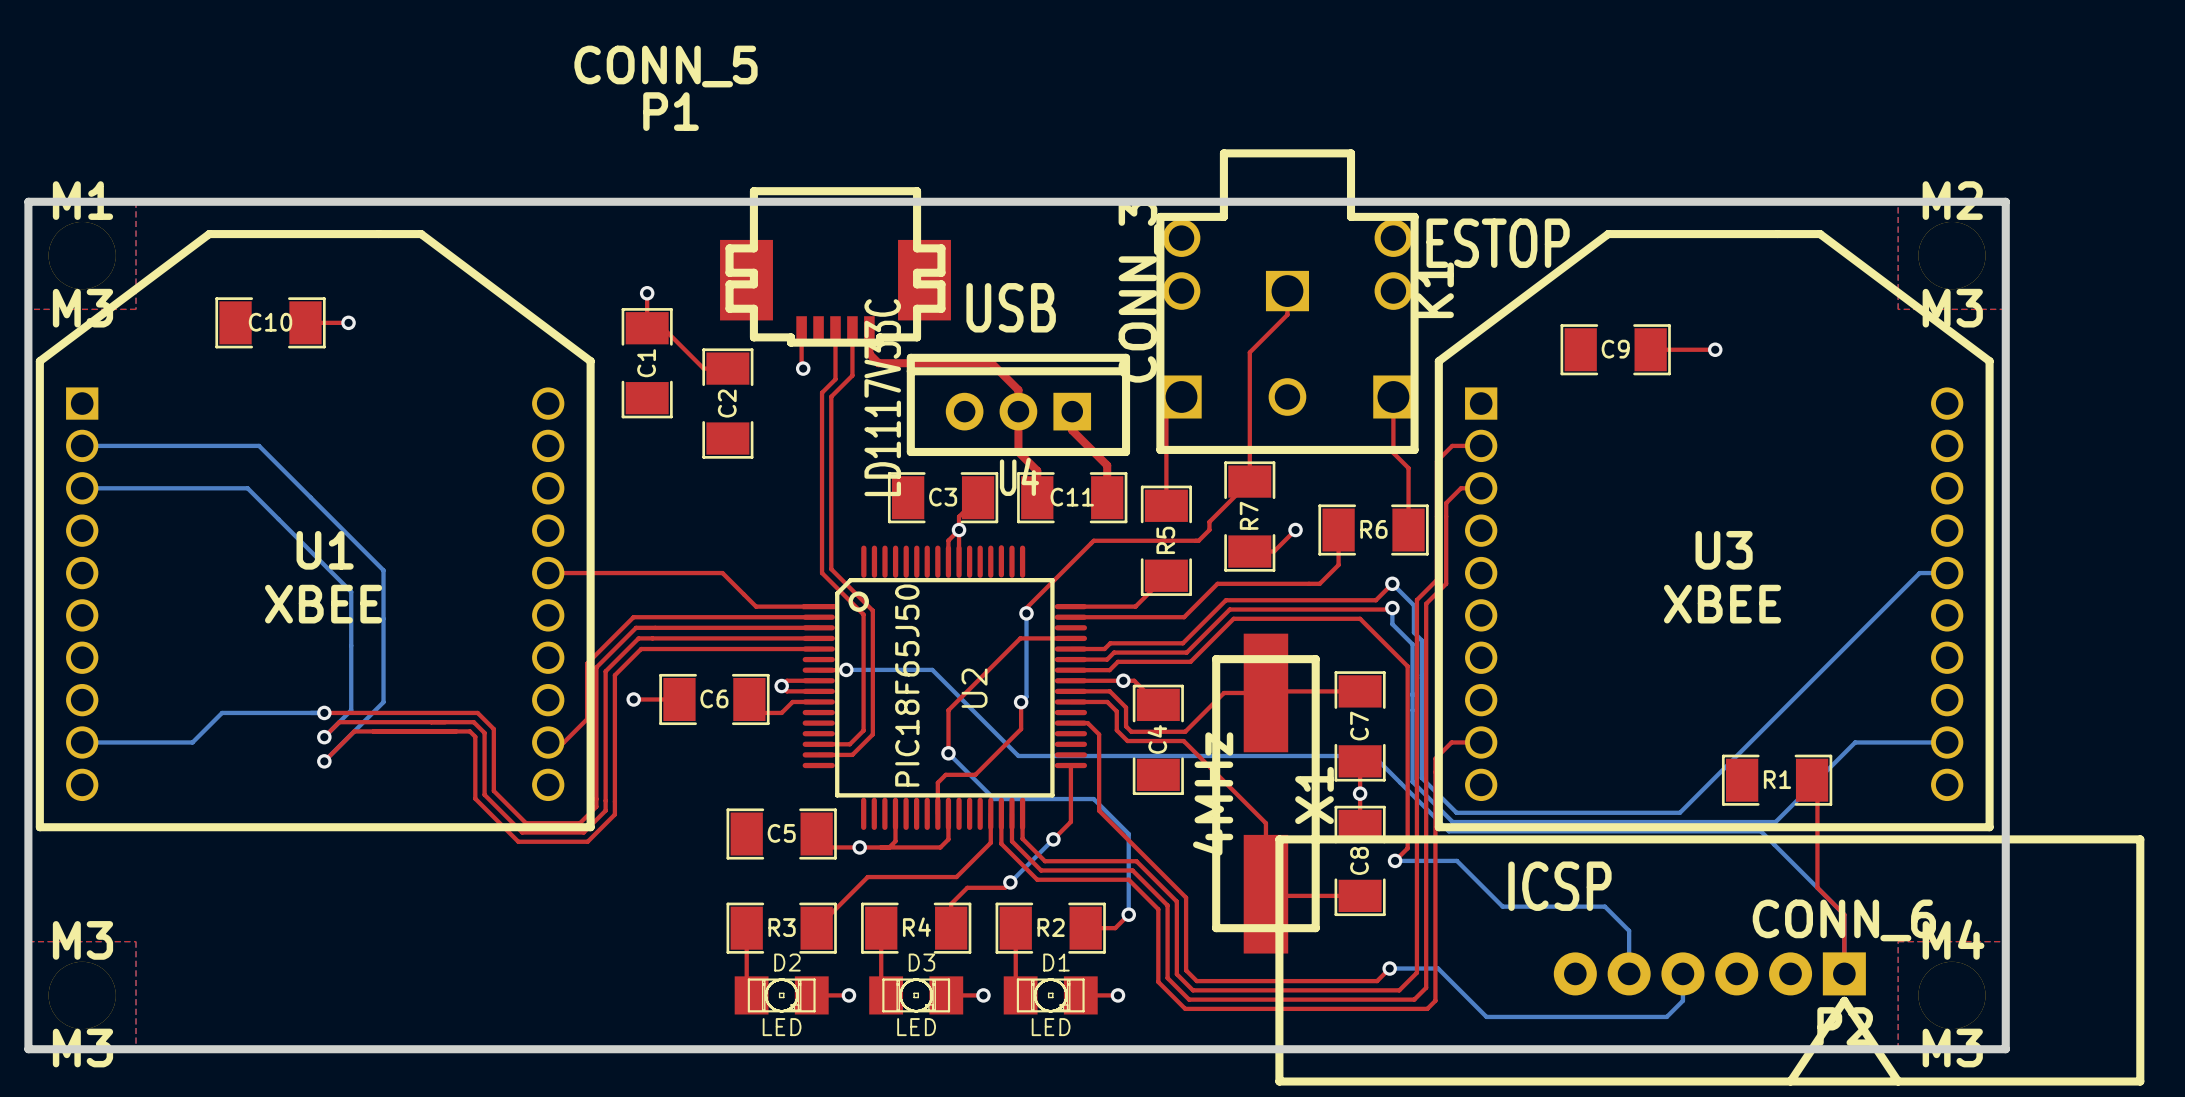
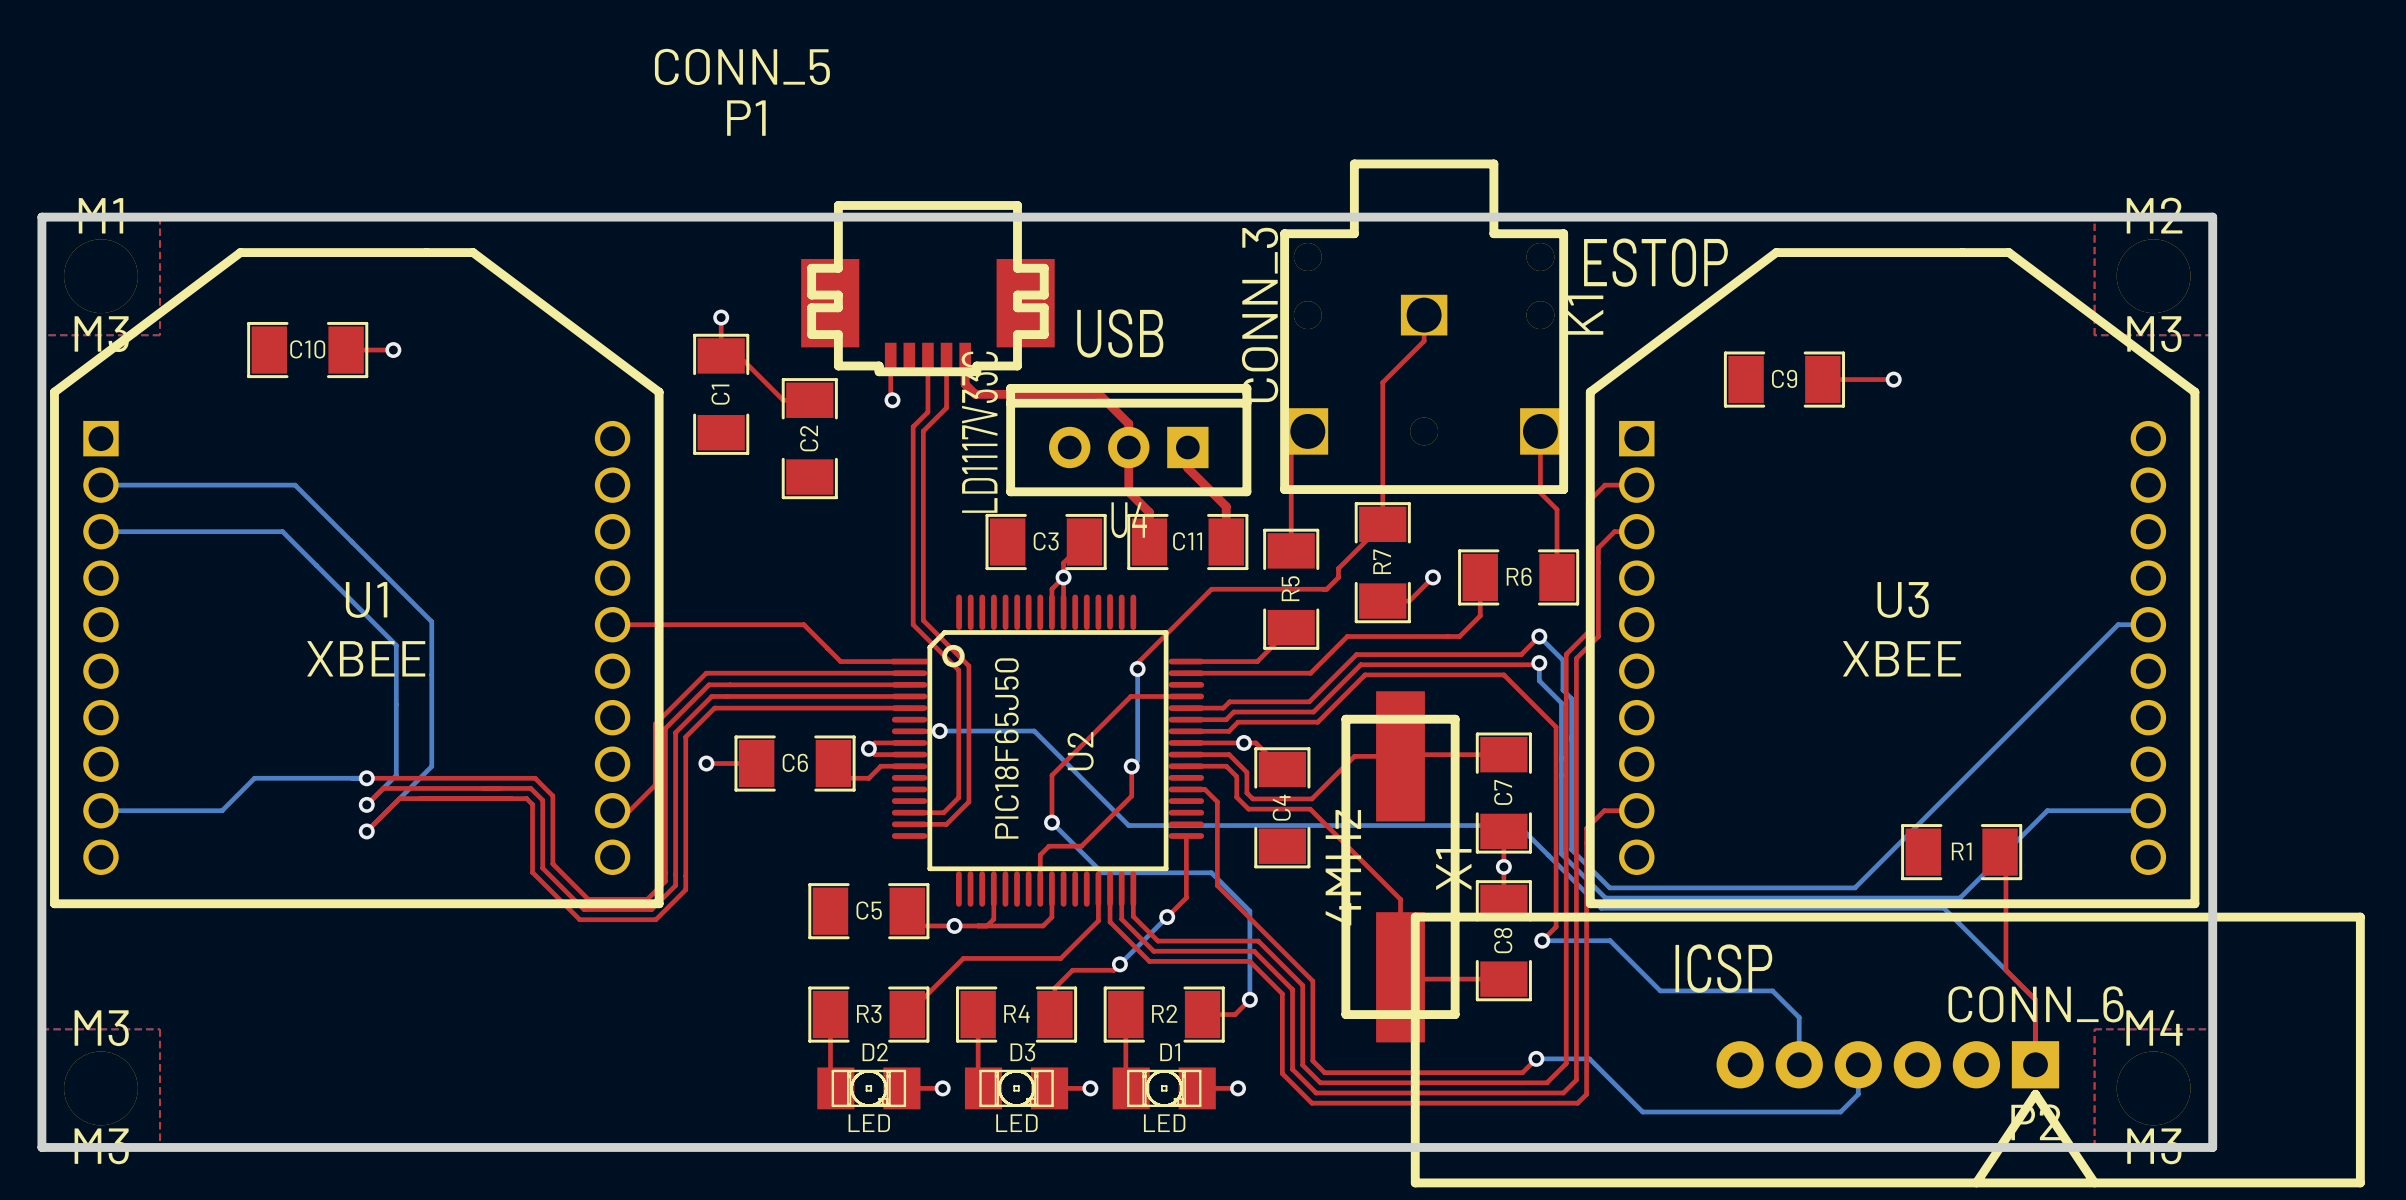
K1 footprint: [1156, 149, 1419, 454] -> [1280, 159, 1569, 494]

